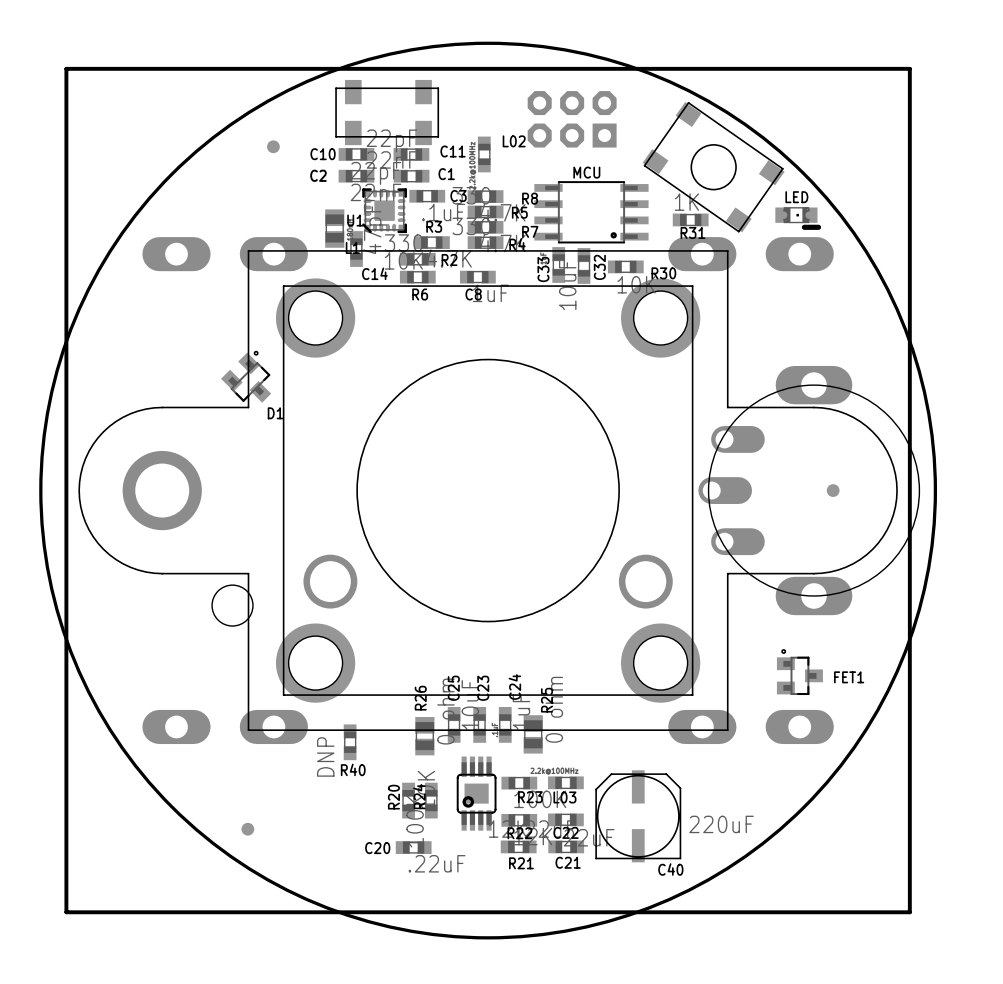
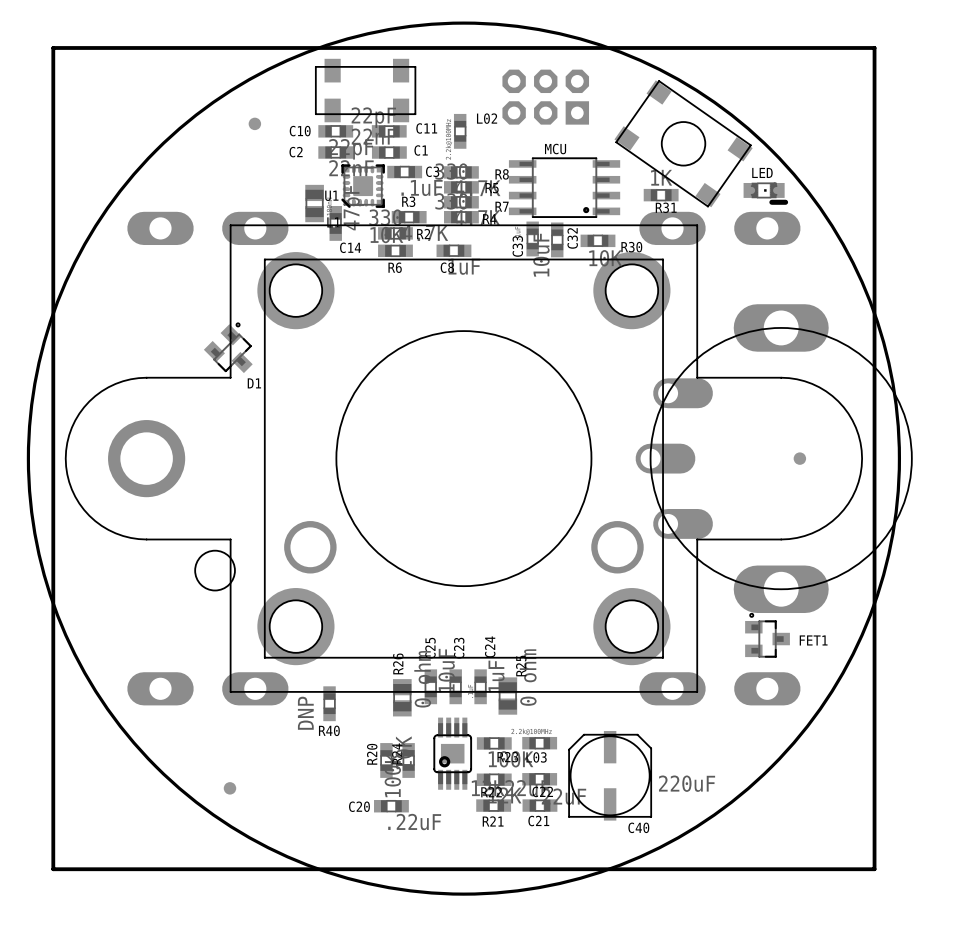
part footprint: [698, 365, 921, 616] -> [635, 304, 913, 614]

